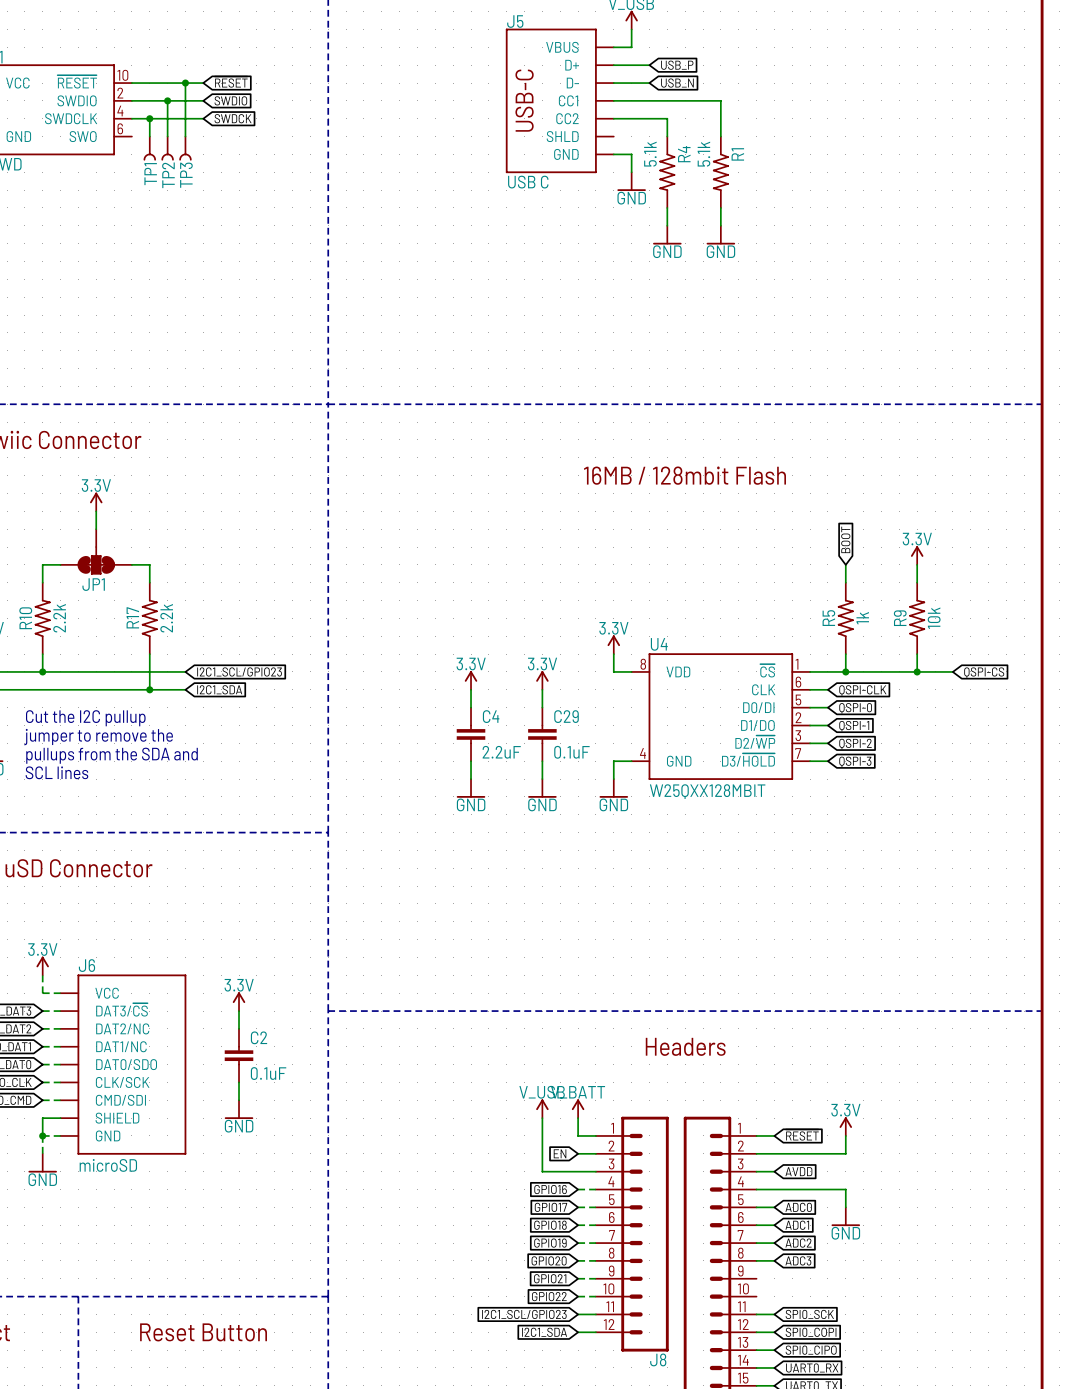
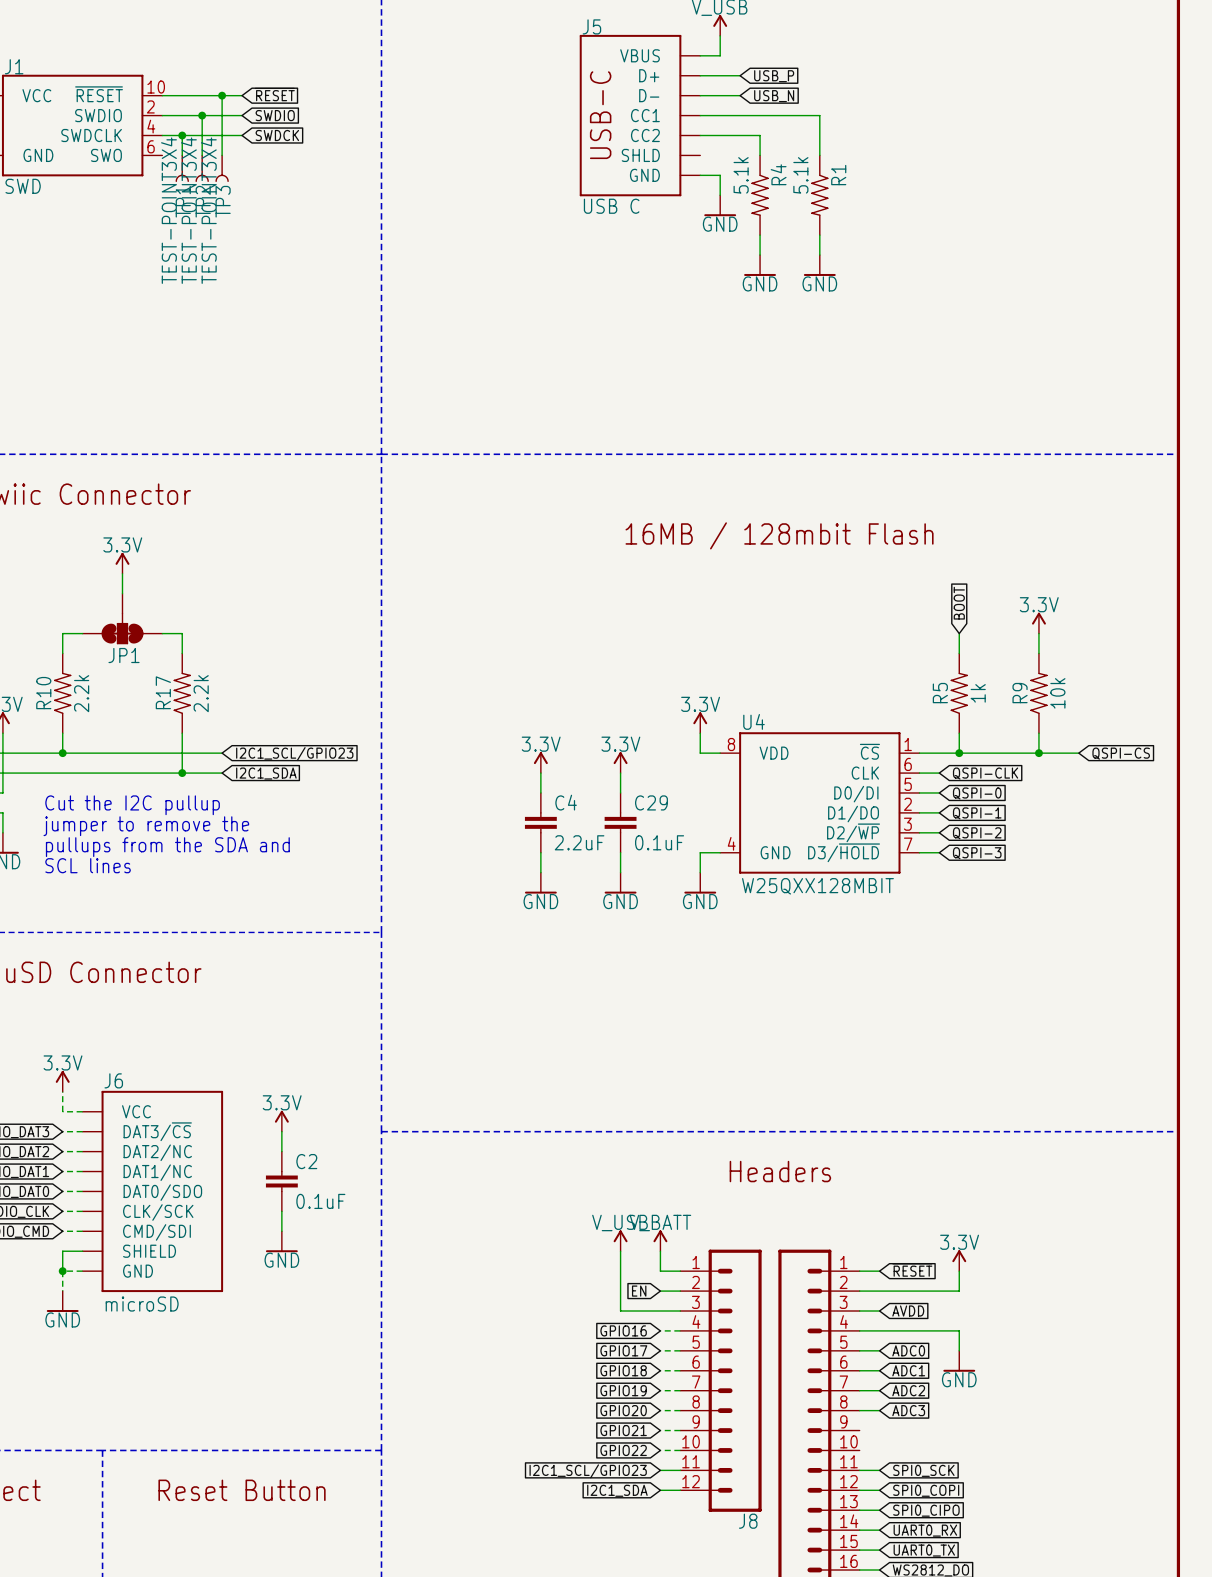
TP1 value: none -> TEST-POINT3X4 (168, 210)
TP2 value: none -> TEST-POINT3X4 (188, 210)
TP3 value: none -> TEST-POINT3X4 (208, 210)

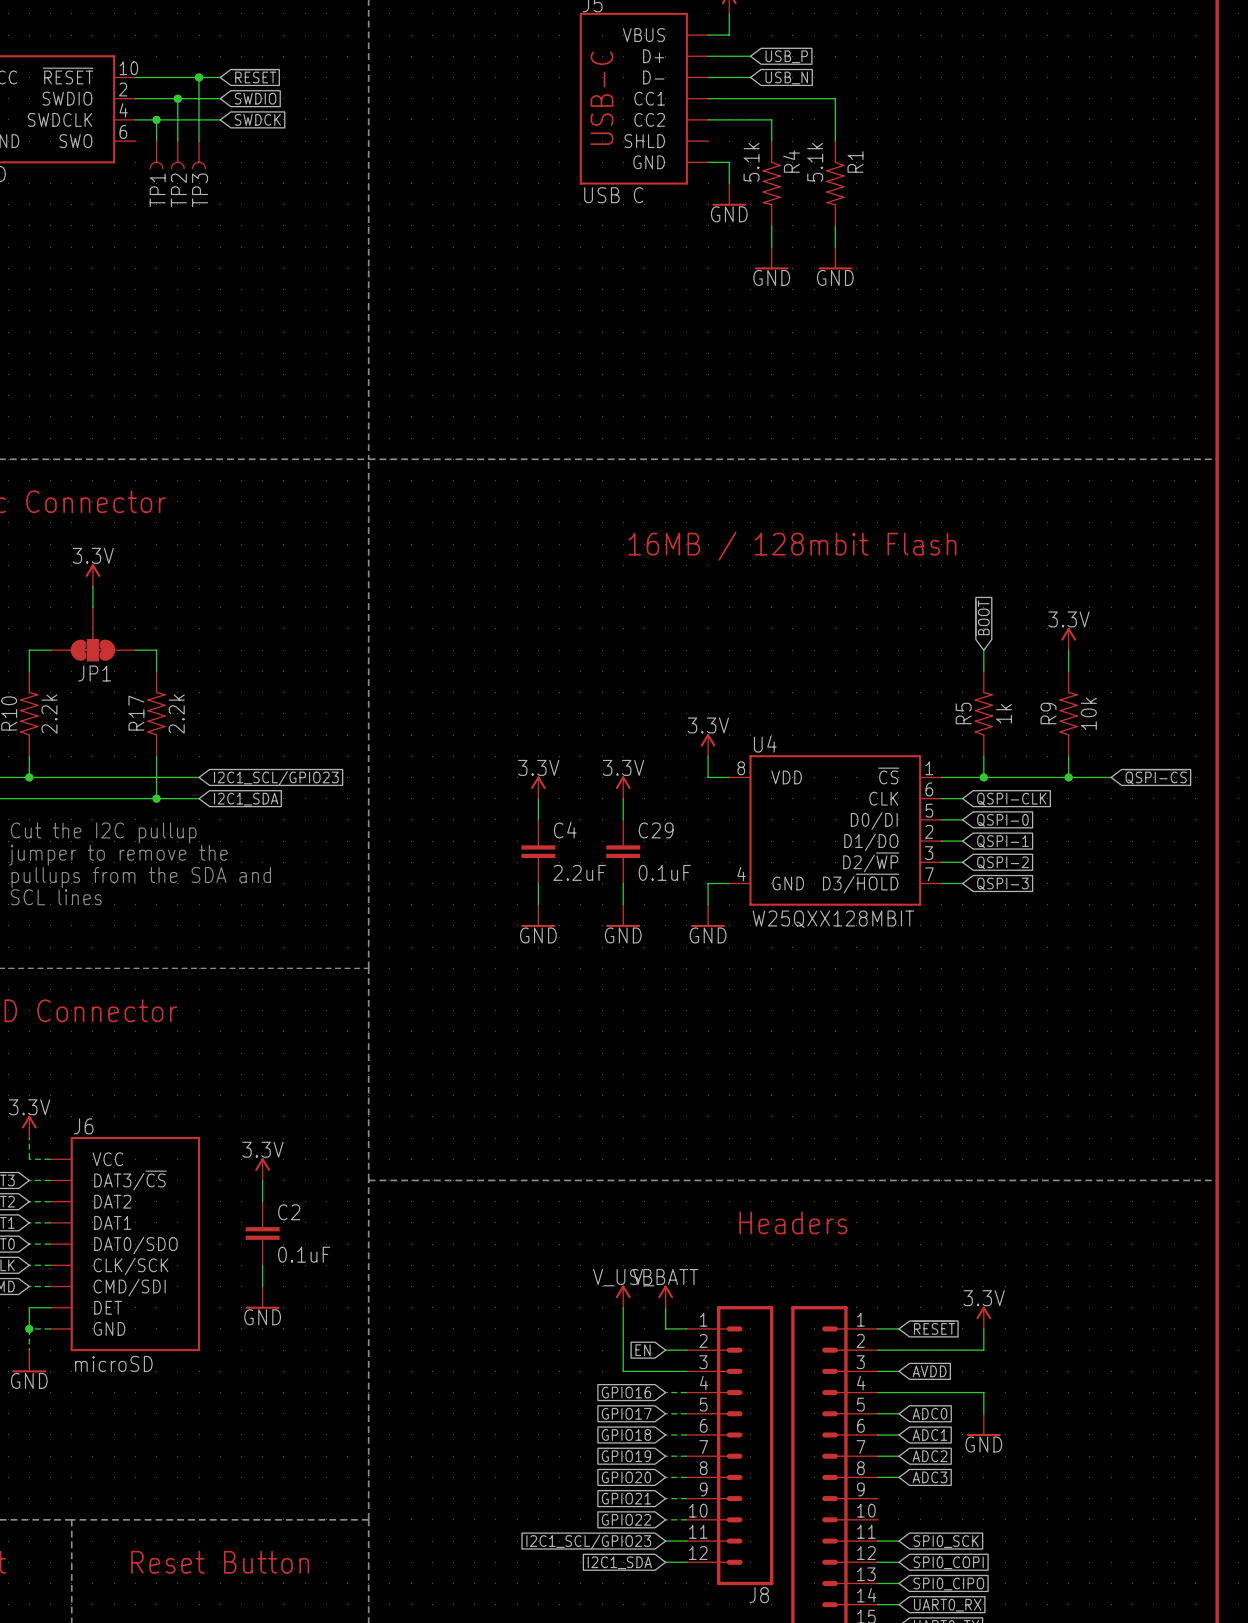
TP1 value: TEST-POINT3X4 (168, 210) -> none
TP2 value: TEST-POINT3X4 (188, 210) -> none
TP3 value: TEST-POINT3X4 (208, 210) -> none
global label: BOOT (959, 603) -> ~{BOOT} (982, 618)
global label: QSPI-CS (1121, 753) -> ~{QSPI-CS} (1156, 776)
J6 pin name: DAT2/NC (157, 1152) -> DAT2 (112, 1201)
J6 pin name: DAT1/NC (157, 1172) -> DAT1 (112, 1222)
J6 pin name: SHIELD (149, 1251) -> DET (108, 1307)

